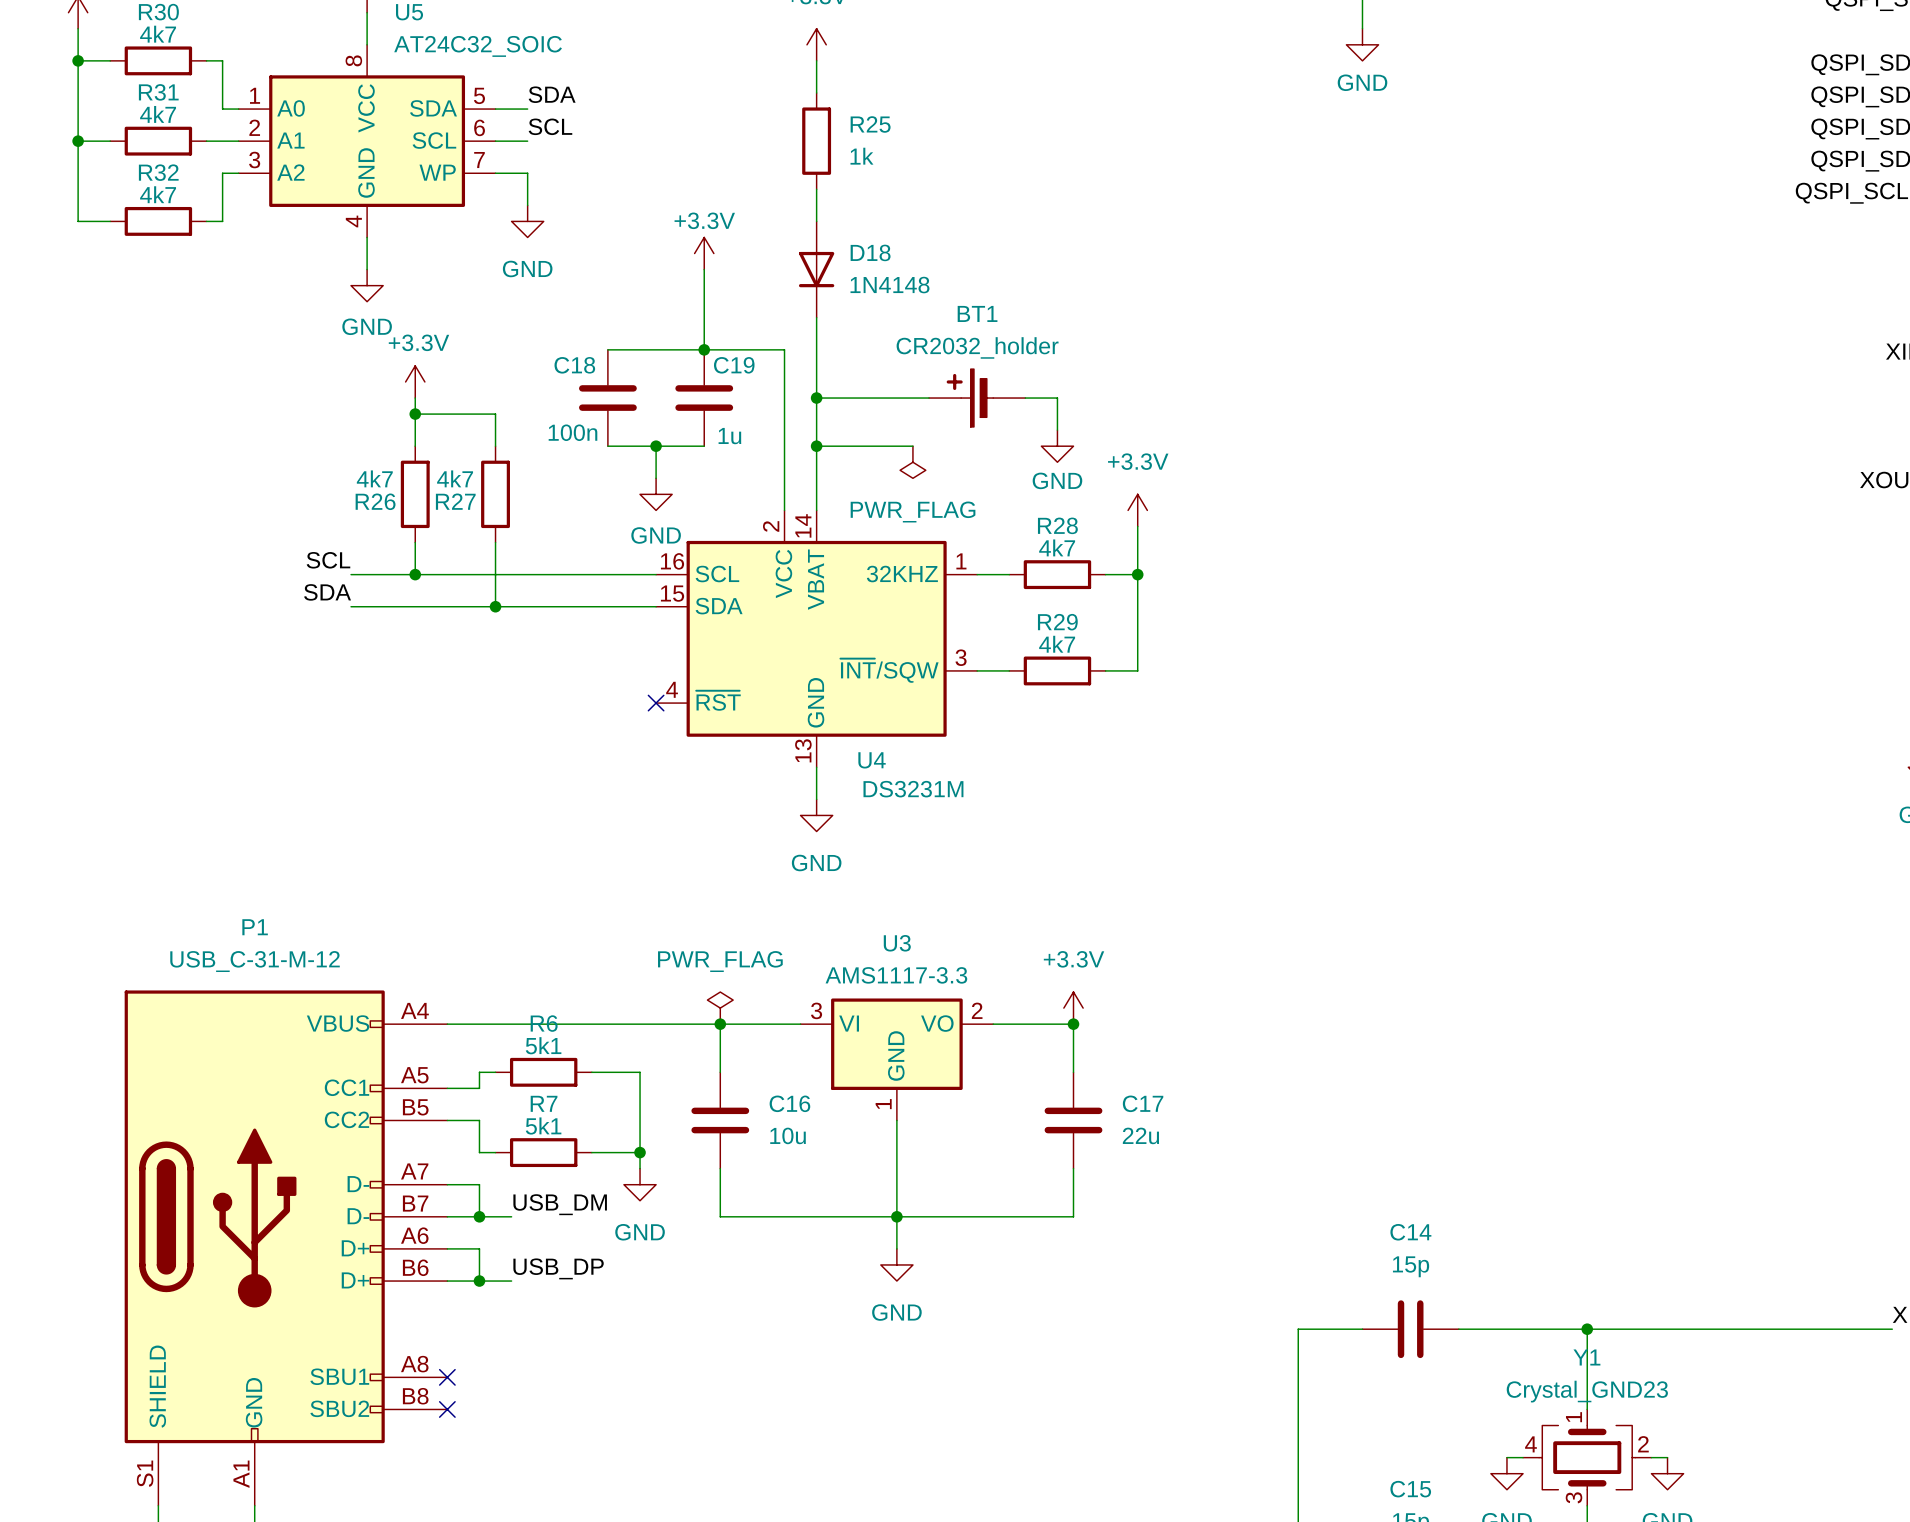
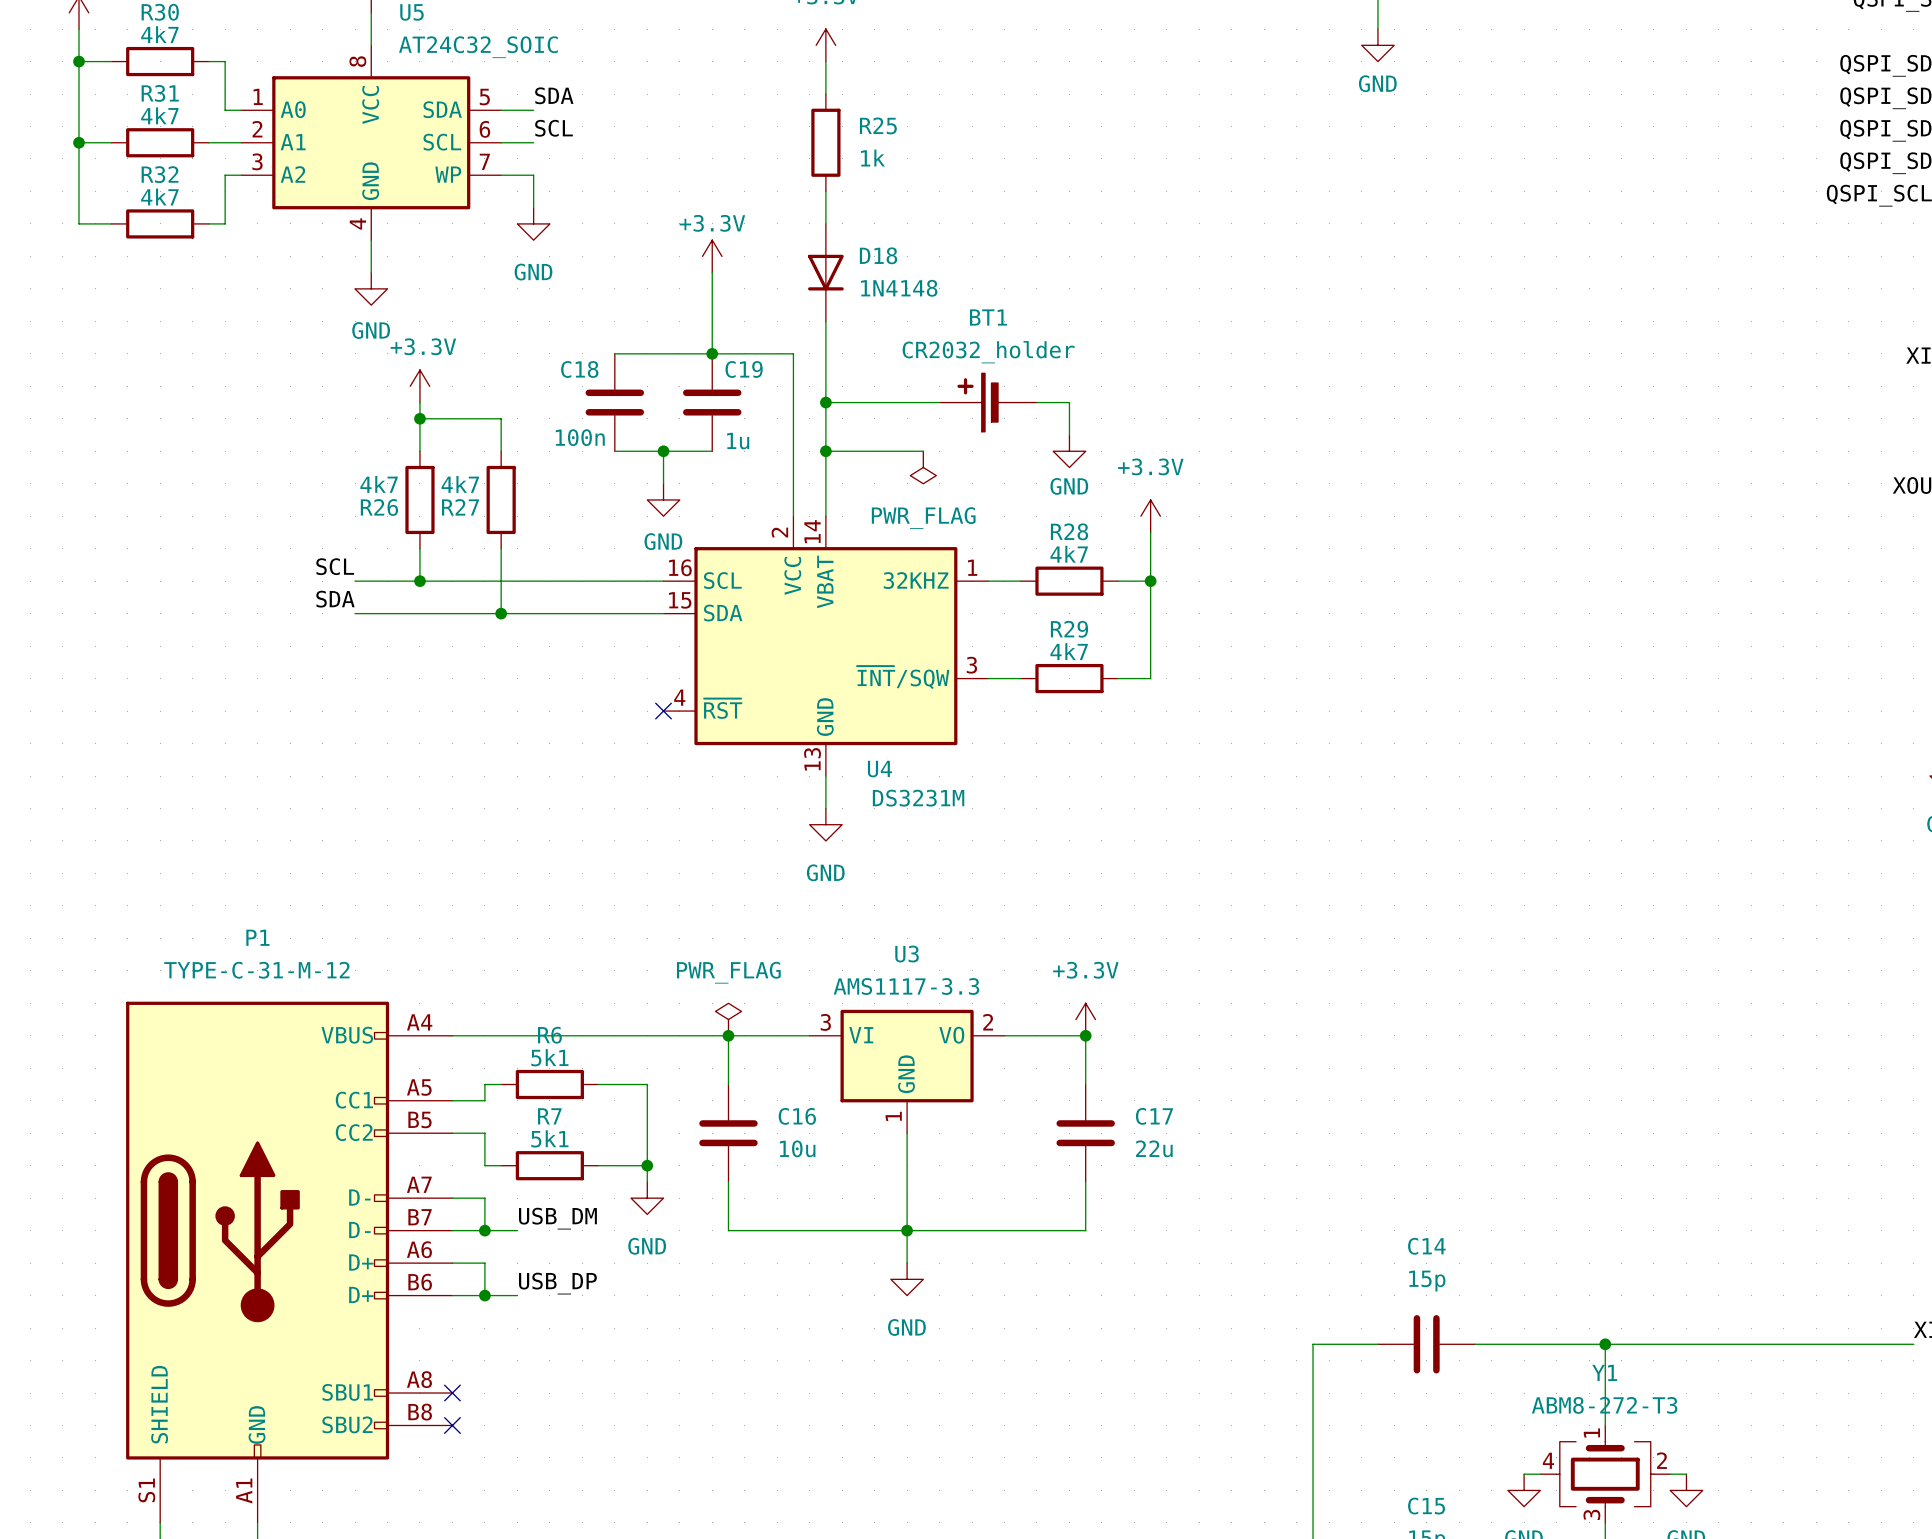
P1 value: USB_C-31-M-12 (255, 961) -> TYPE-C-31-M-12 (256, 970)
Y1 value: Crystal_GND23 (1587, 1391) -> ABM8-272-T3 (1604, 1405)

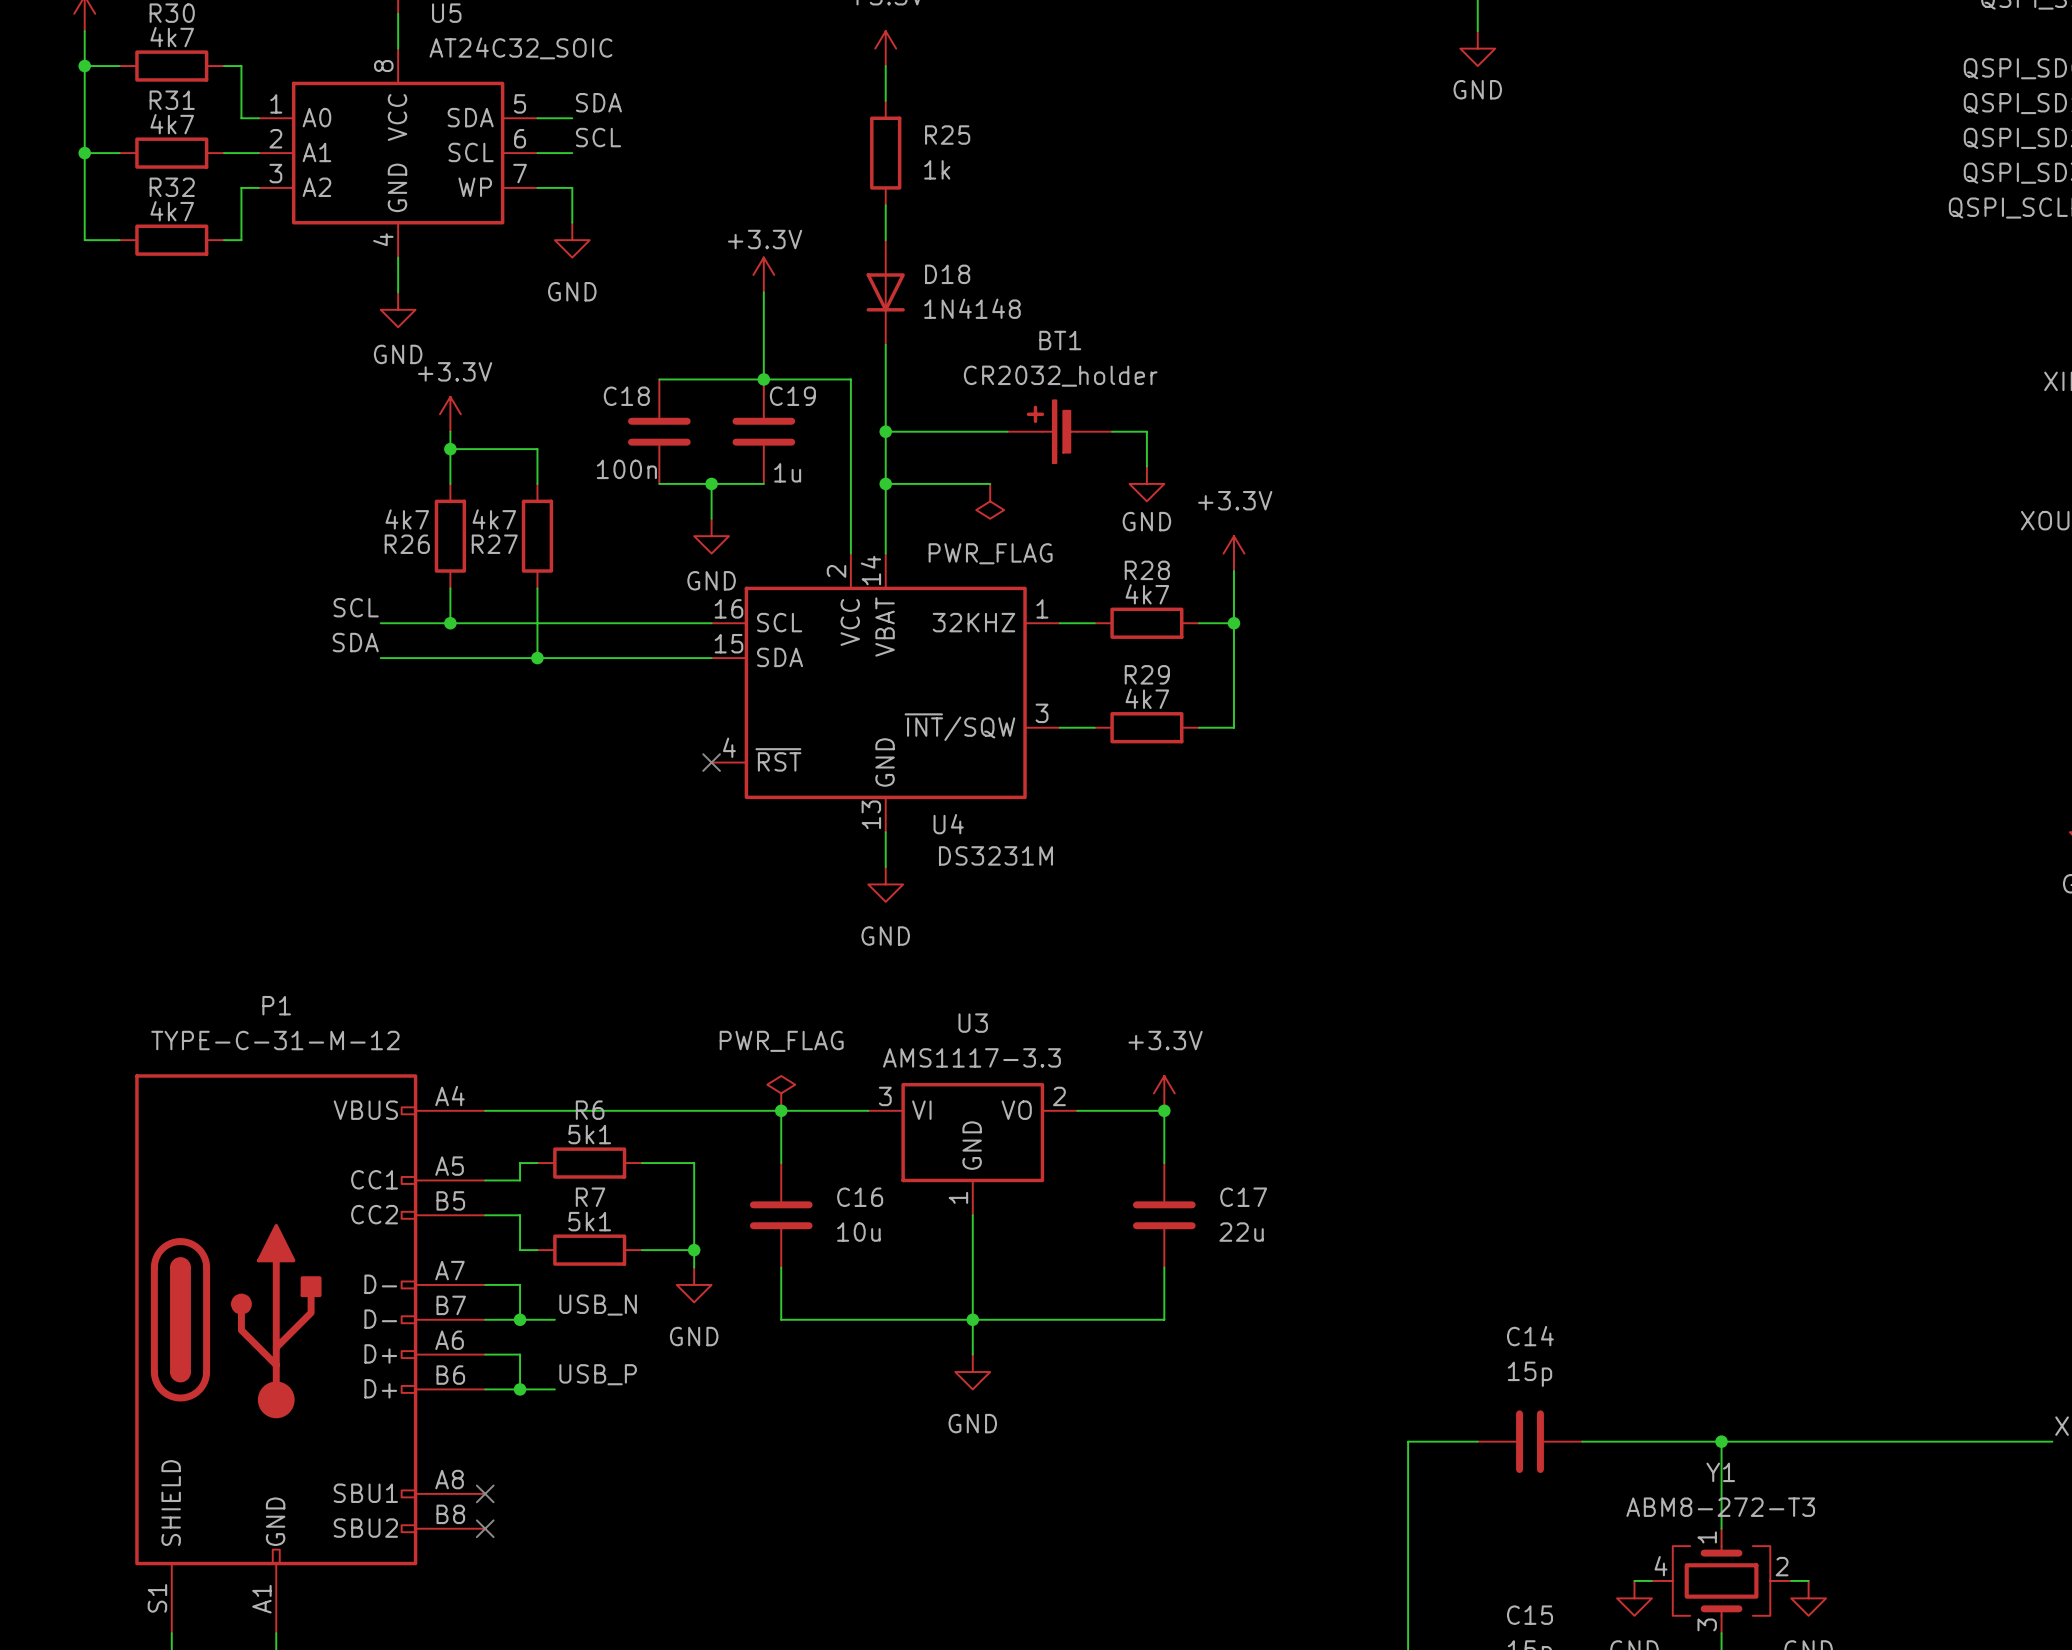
label: USB_DM (557, 1218) -> USB_N (598, 1305)
label: USB_DP (557, 1283) -> USB_P (598, 1374)

